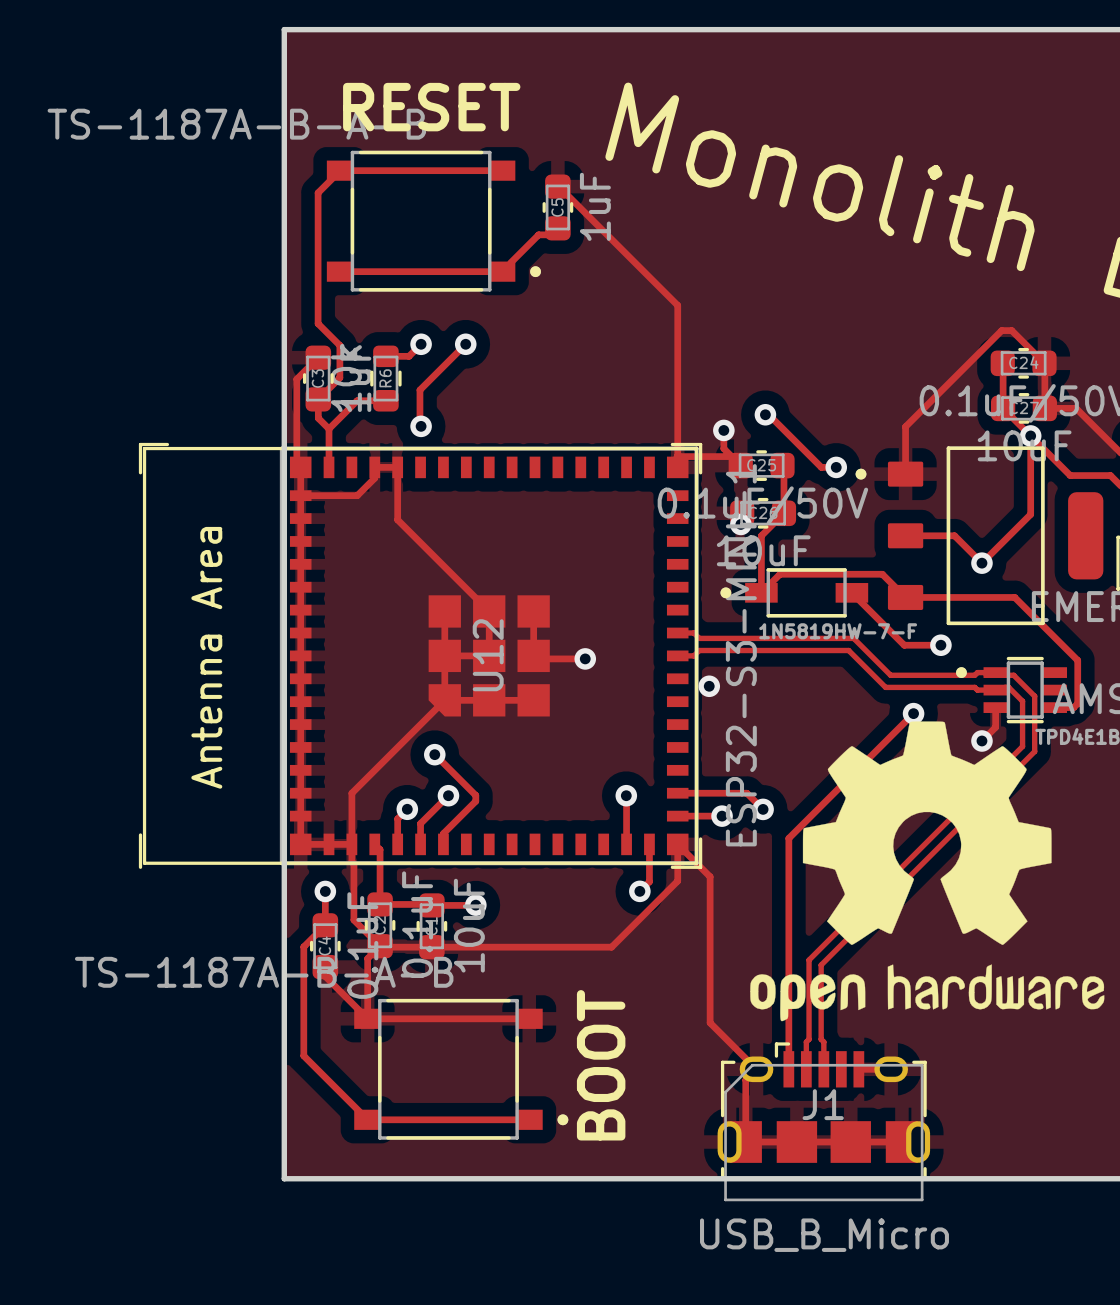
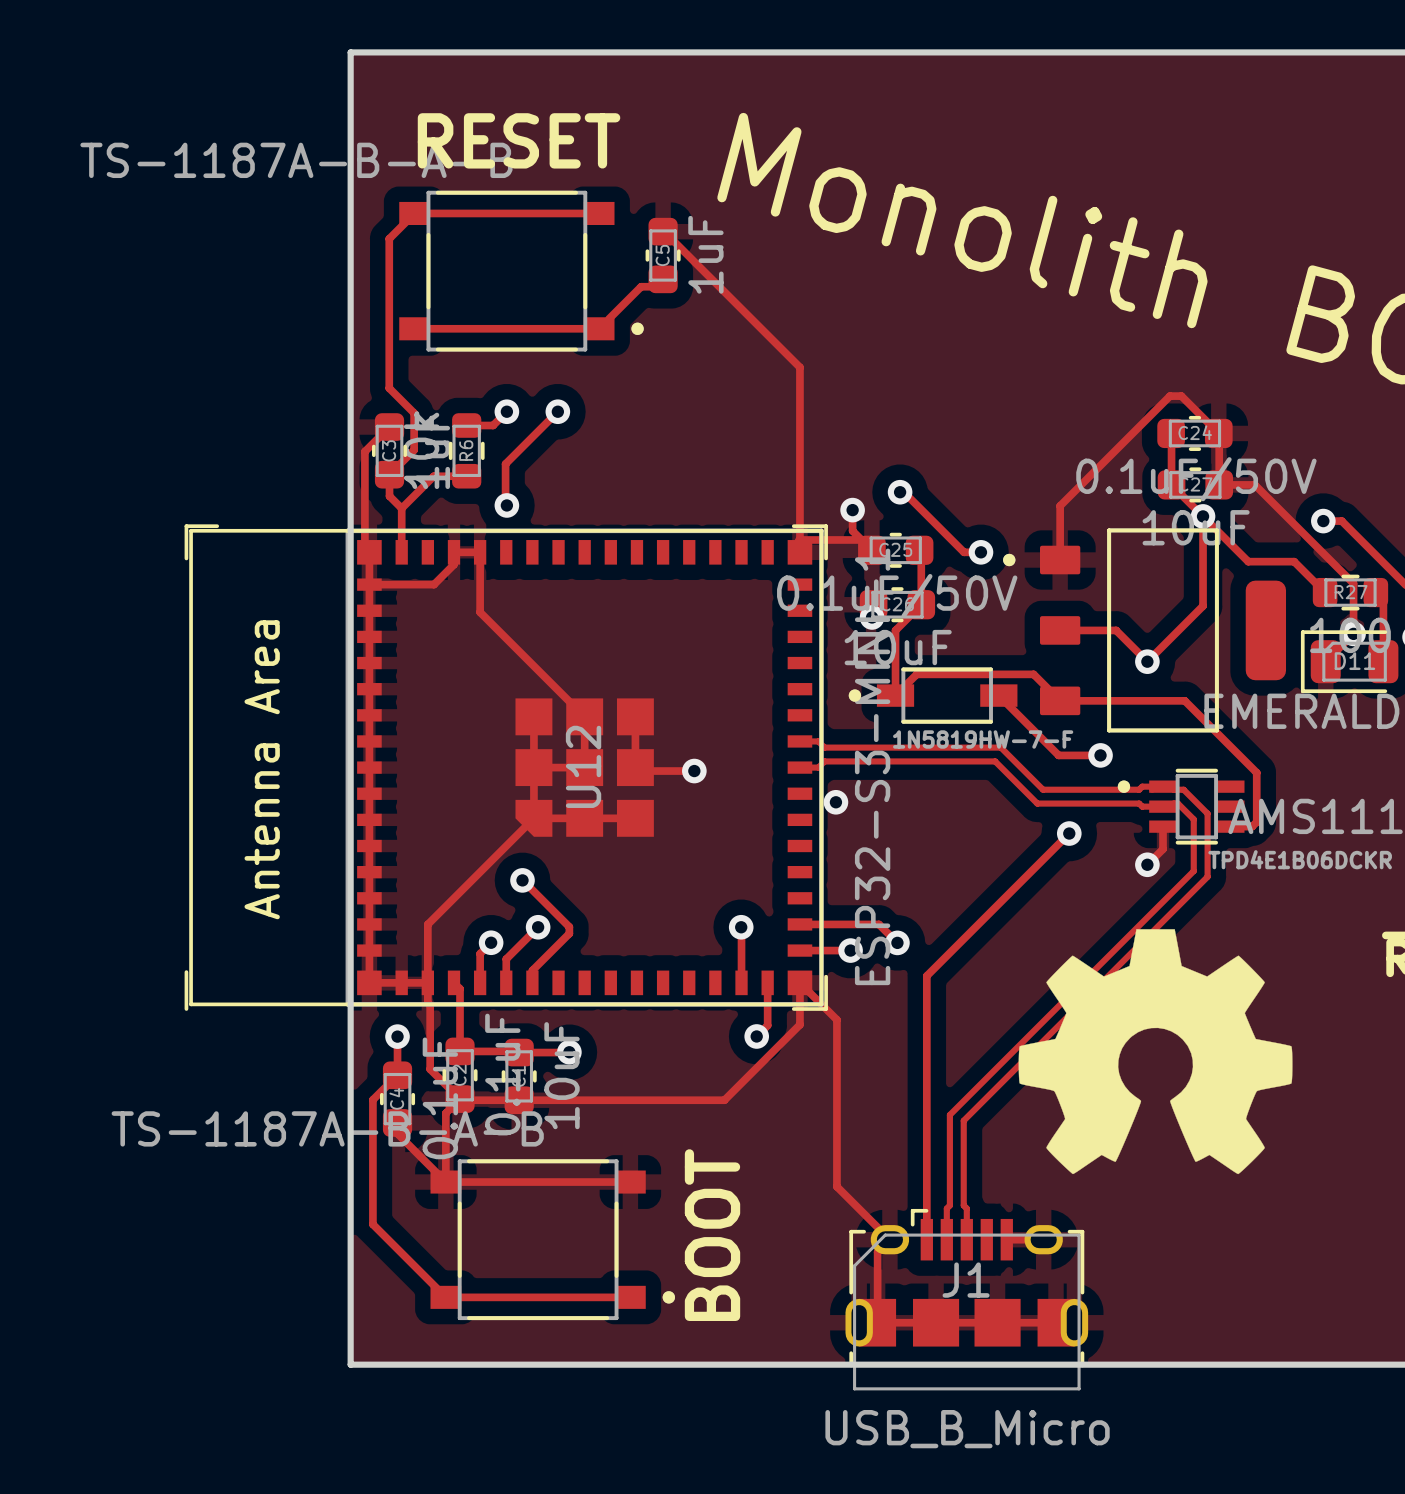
drawing: [750, 721, 1105, 1022] -> none
drawing: none -> [1018, 929, 1293, 1175]

